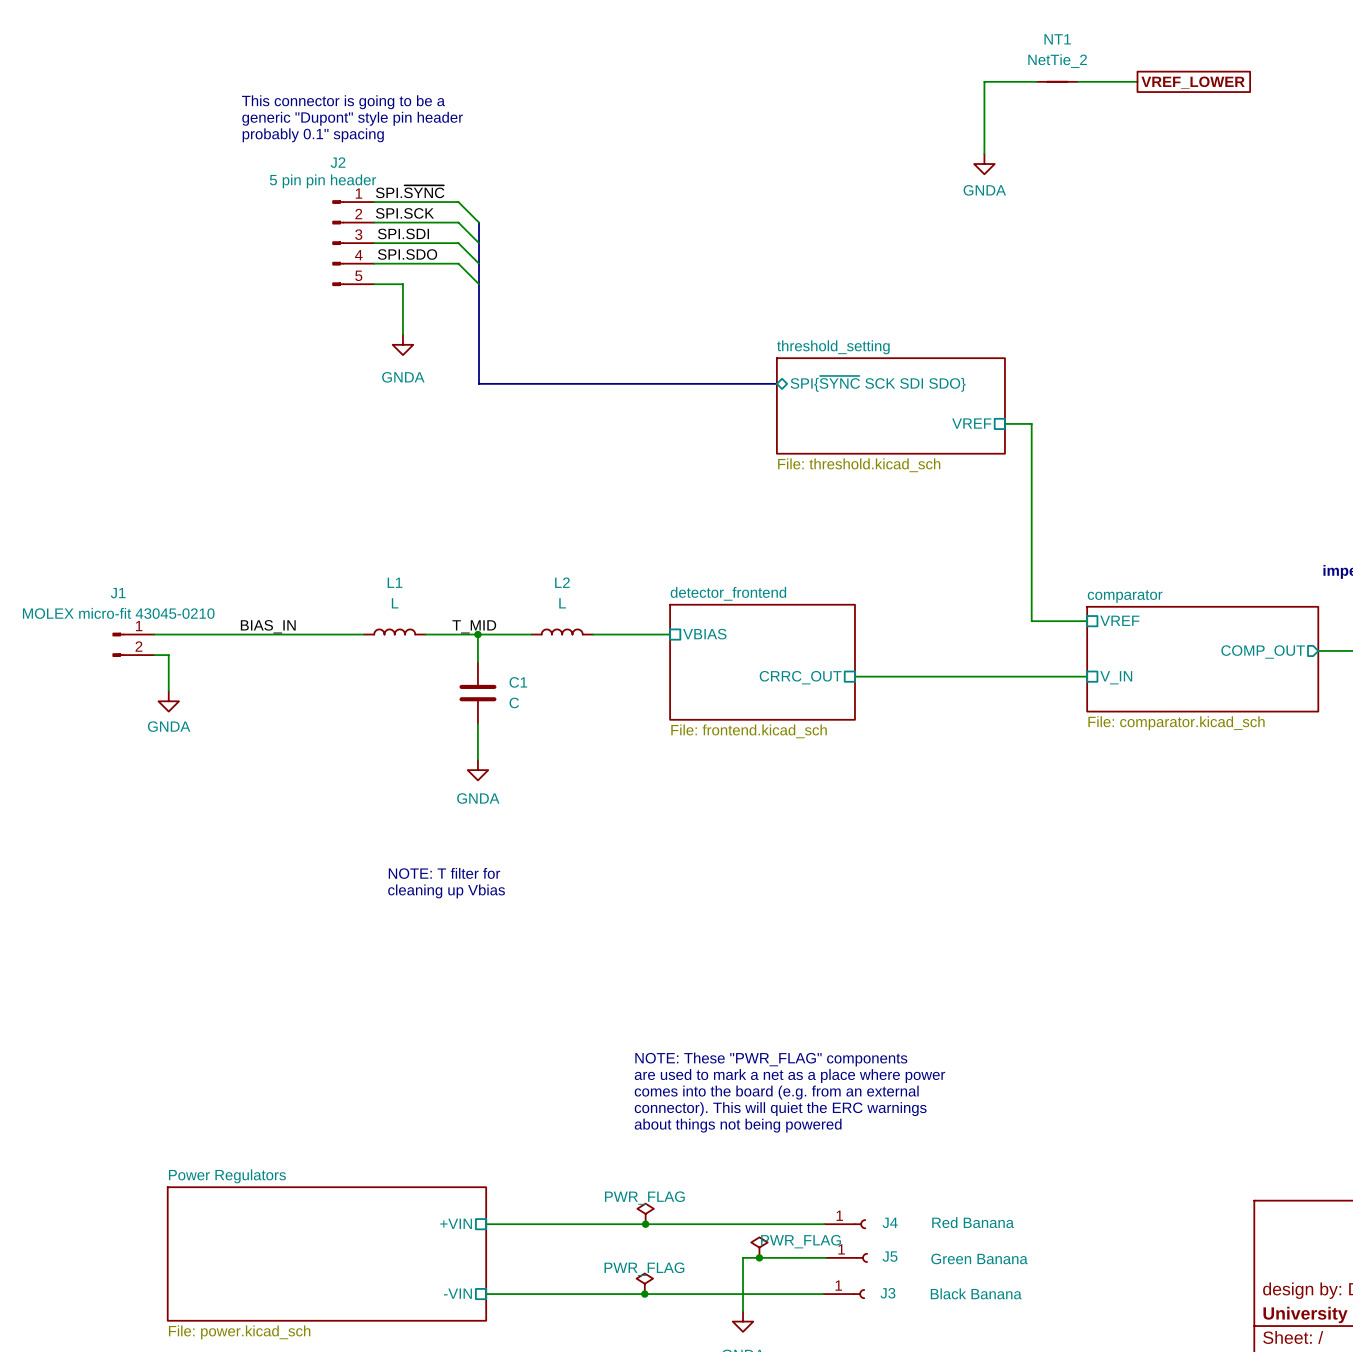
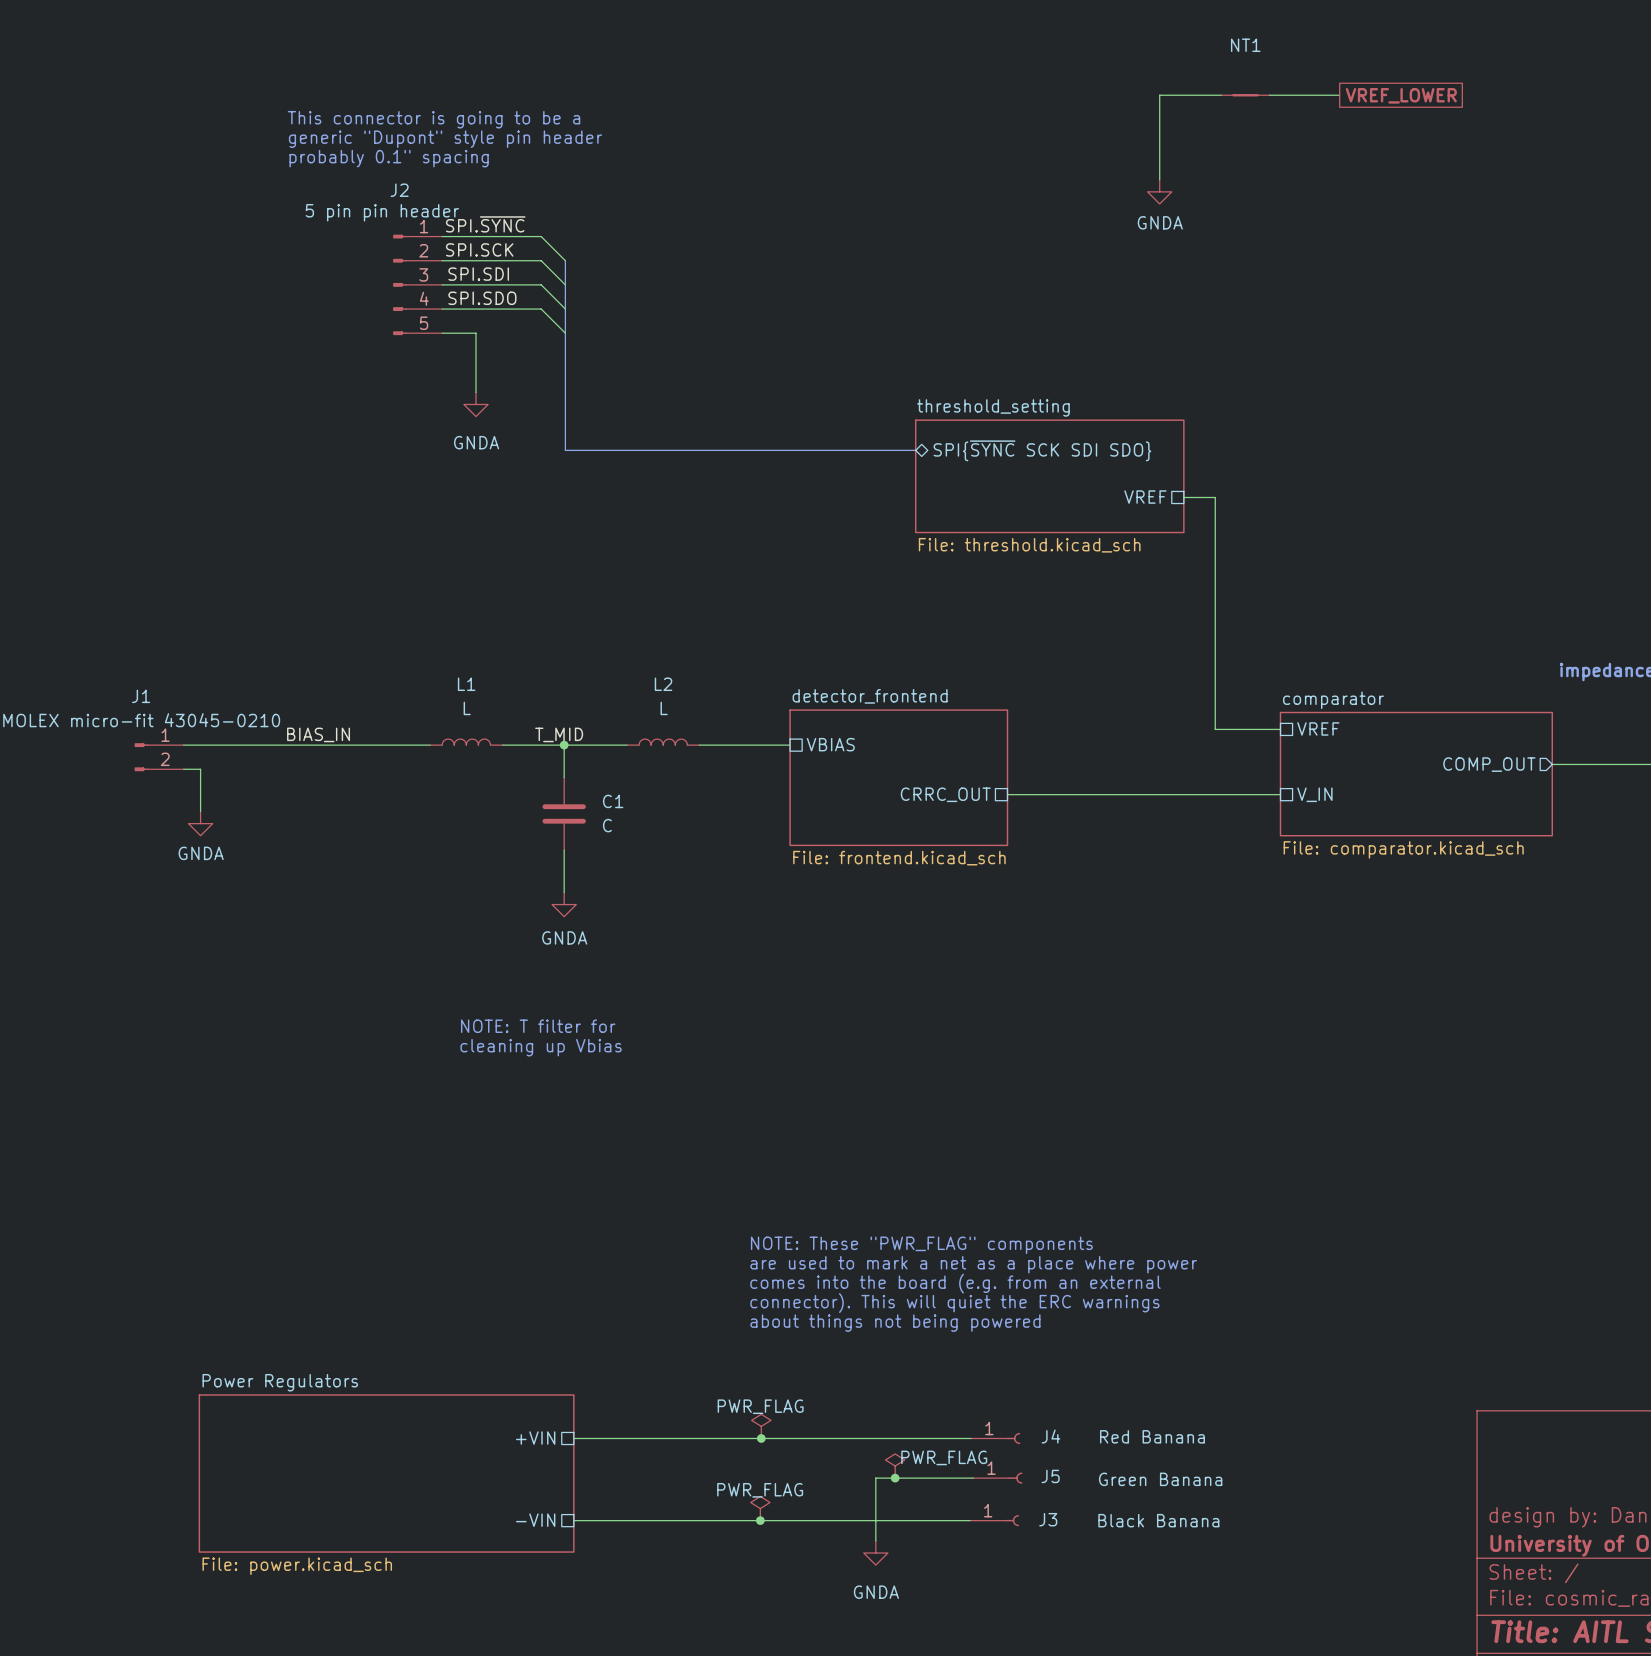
NT1 value: NetTie_2 (1057, 61) -> none

